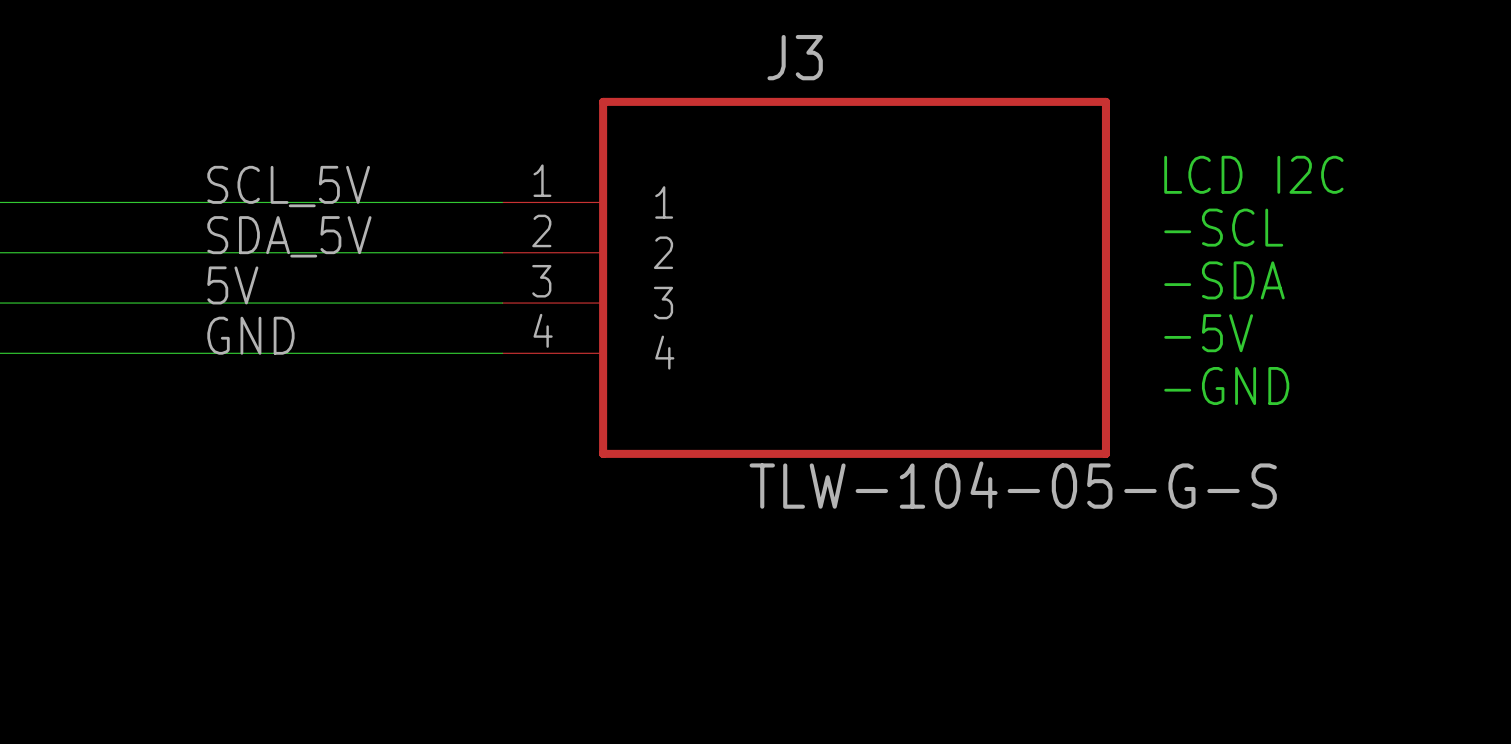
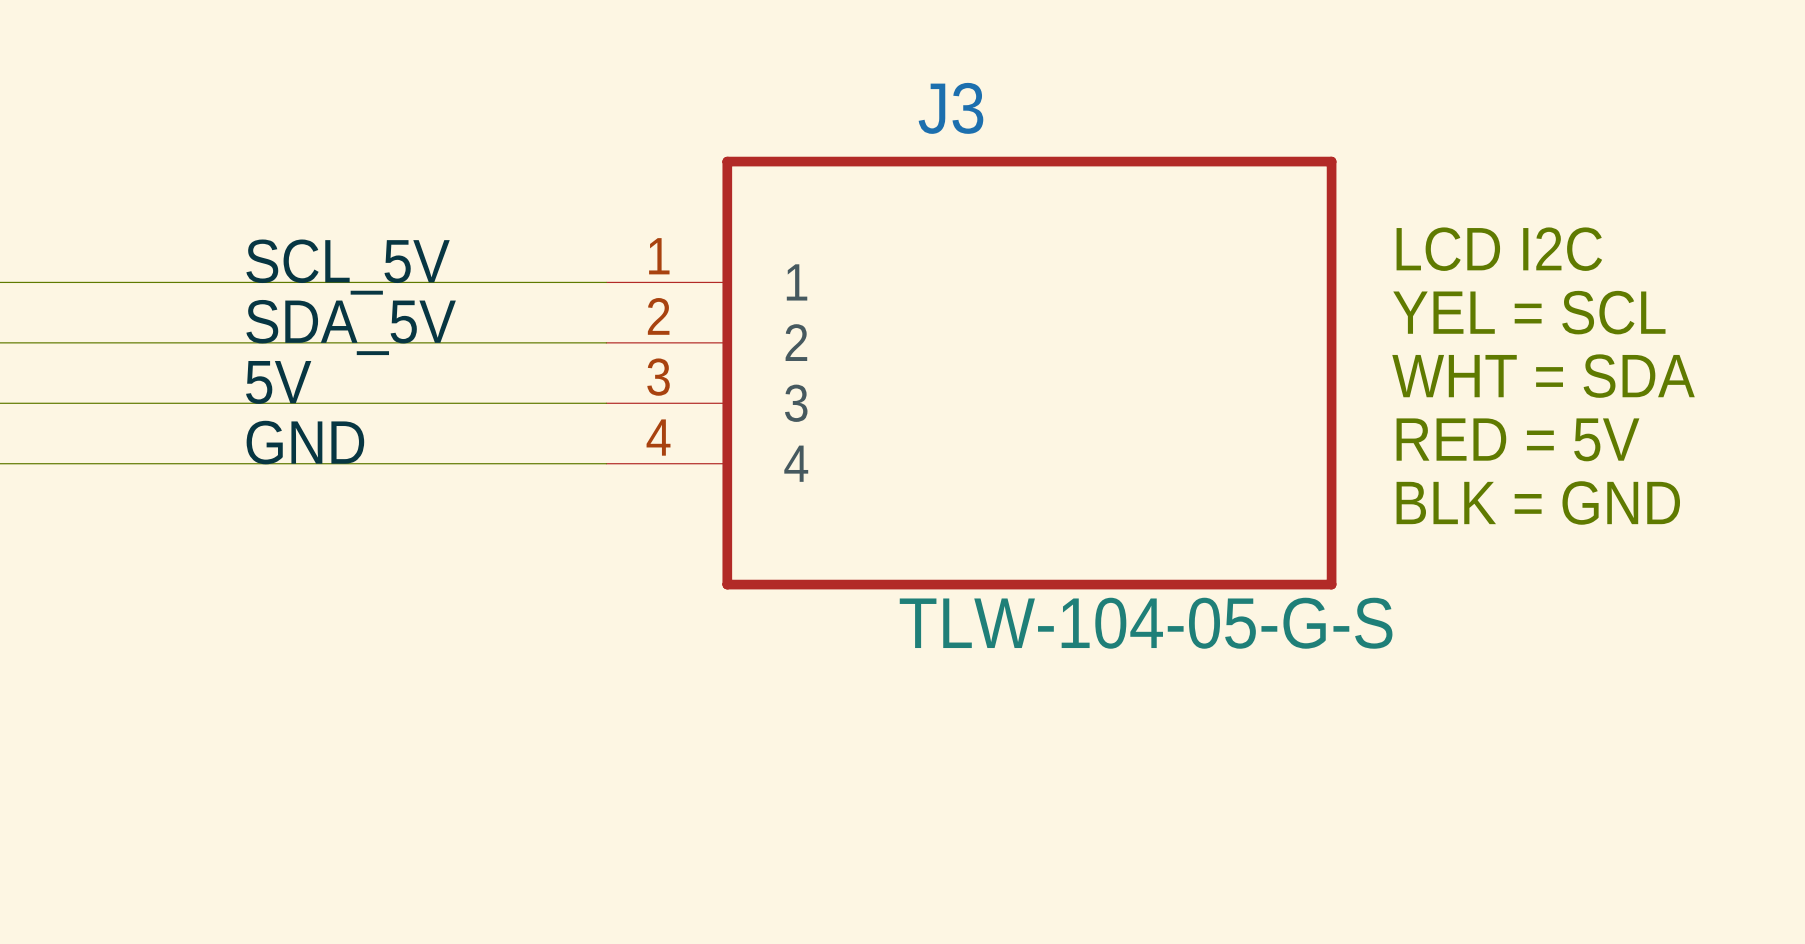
text: -SCL (1223, 227) -> YEL = SCL (1529, 312)
text: -SDA (1224, 280) -> WHT = SDA (1543, 376)
text: -5V (1208, 333) -> RED = 5V (1517, 439)
text: -GND (1226, 386) -> BLK = GND (1538, 502)

